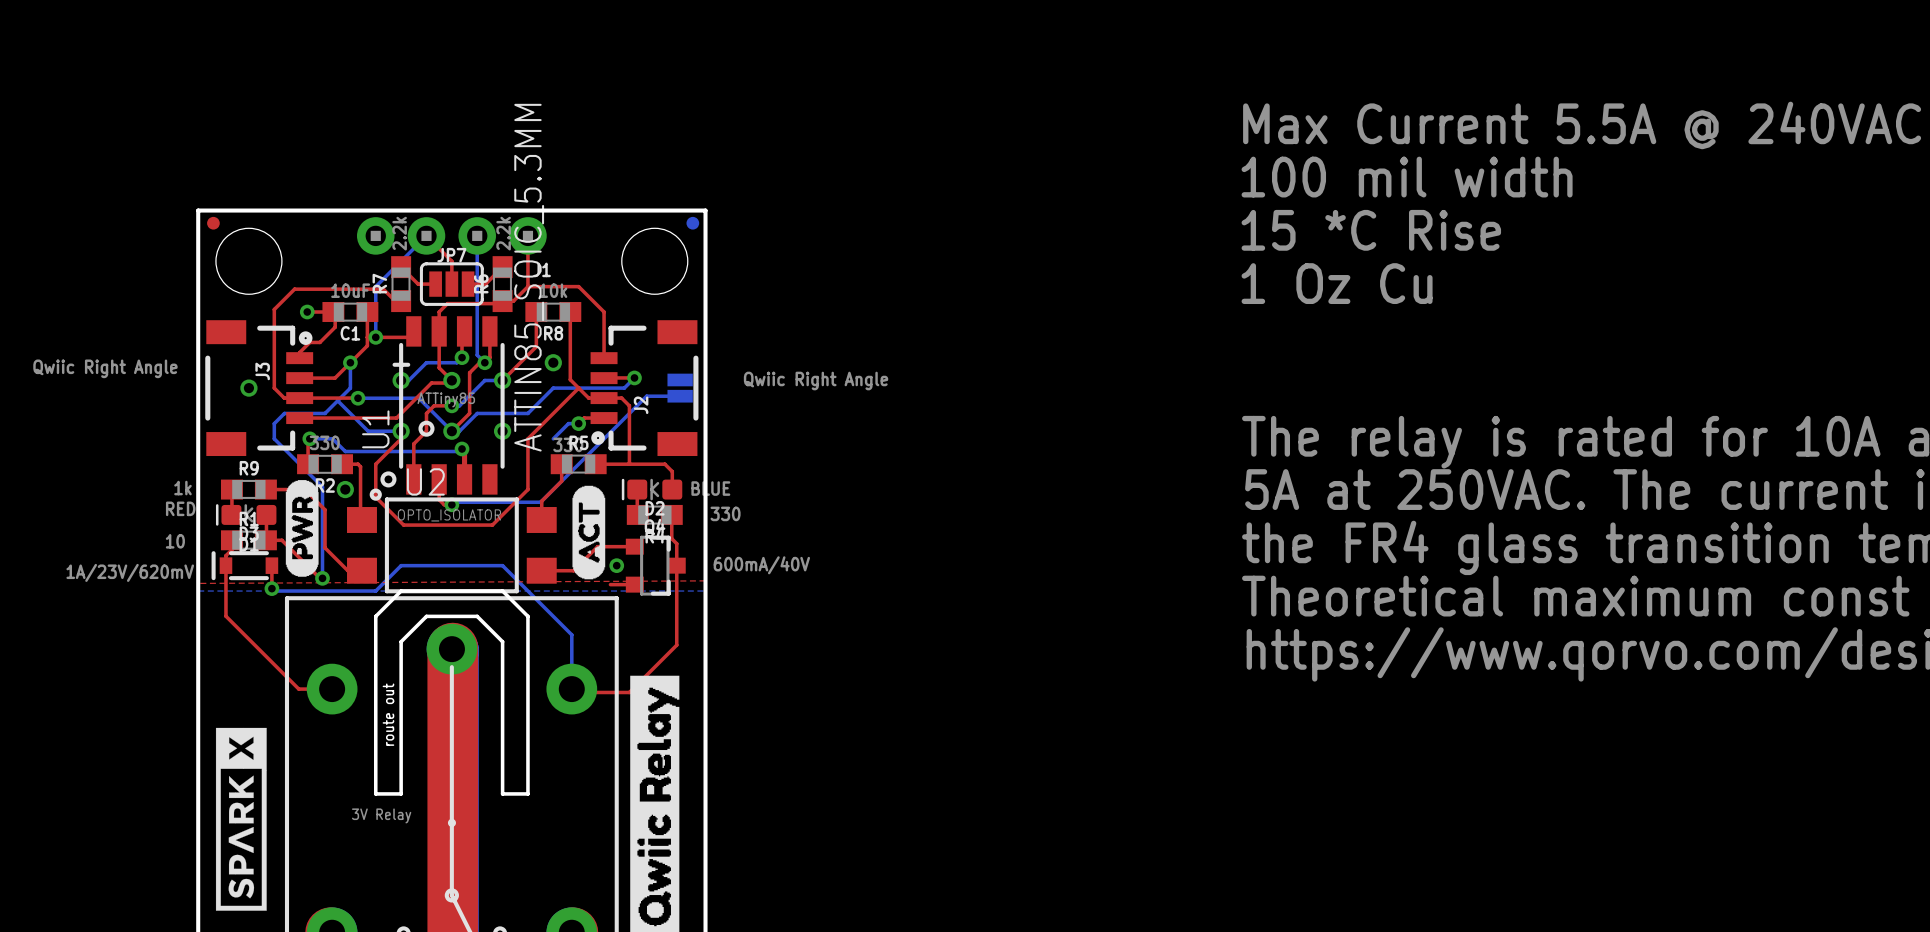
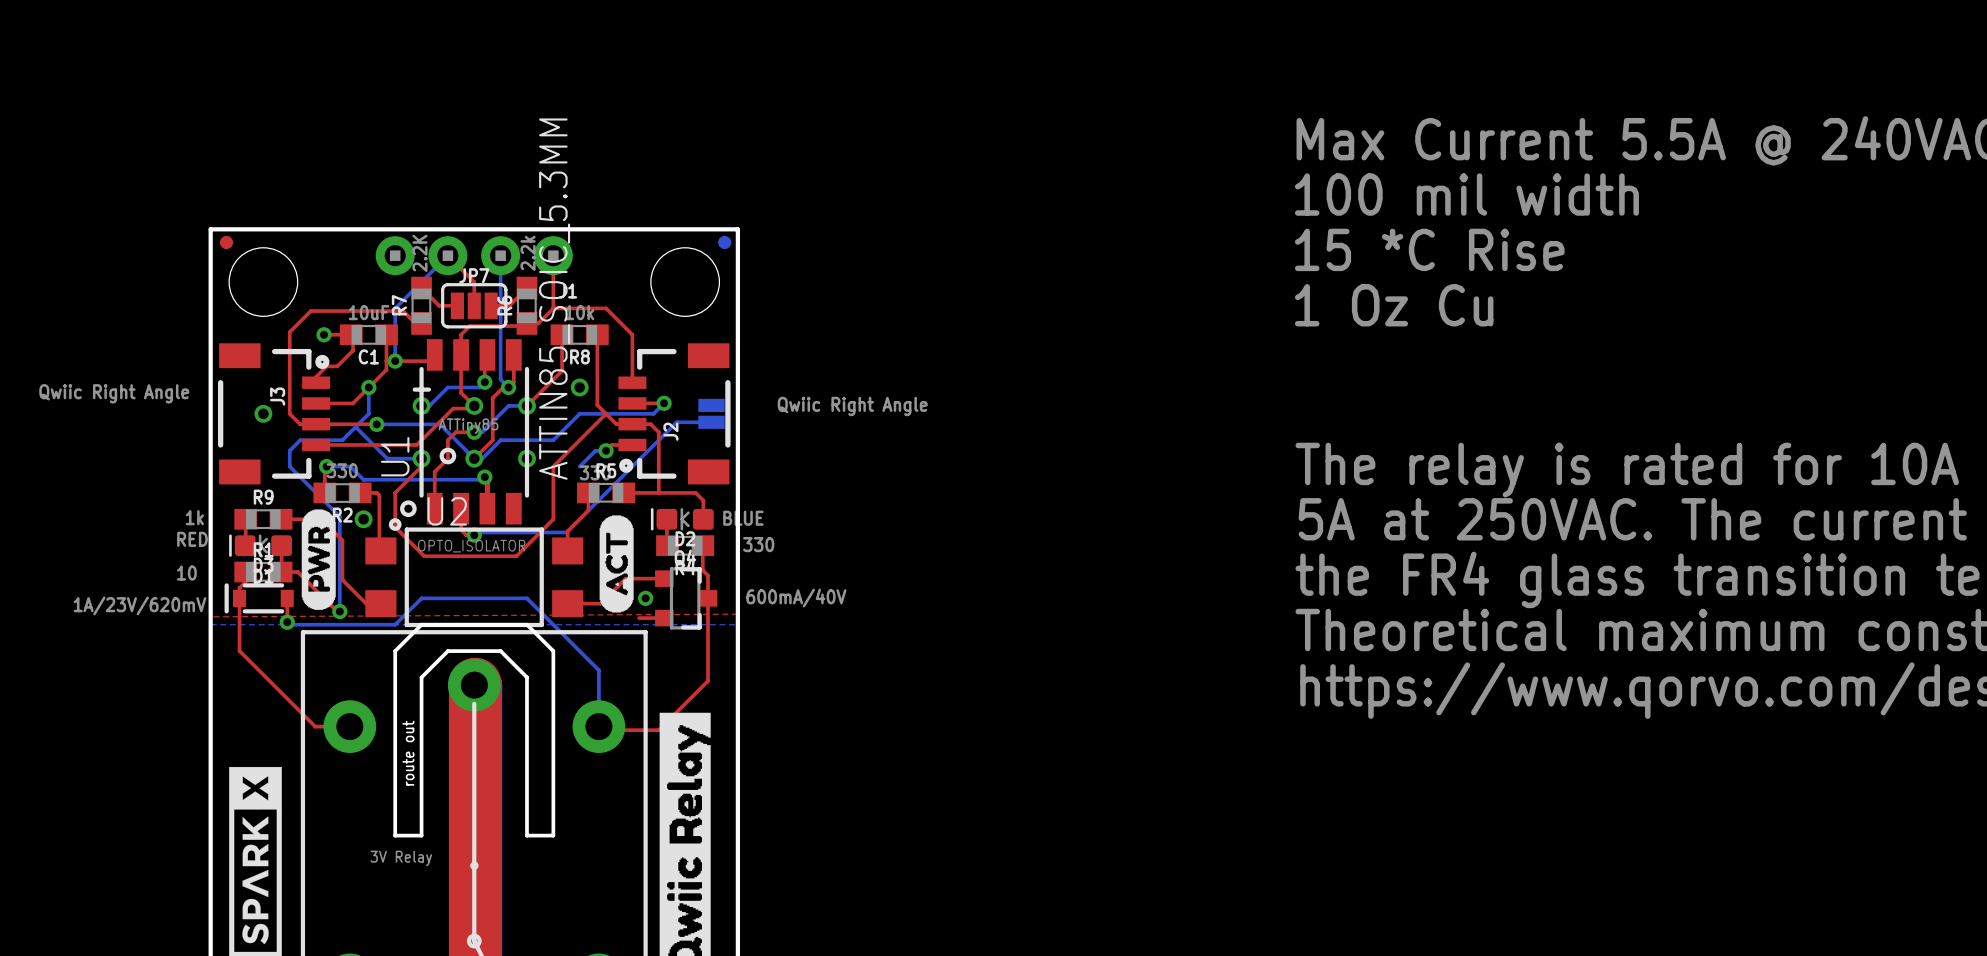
R7 value: 2.2k (399, 233) -> 2.2K (419, 253)

